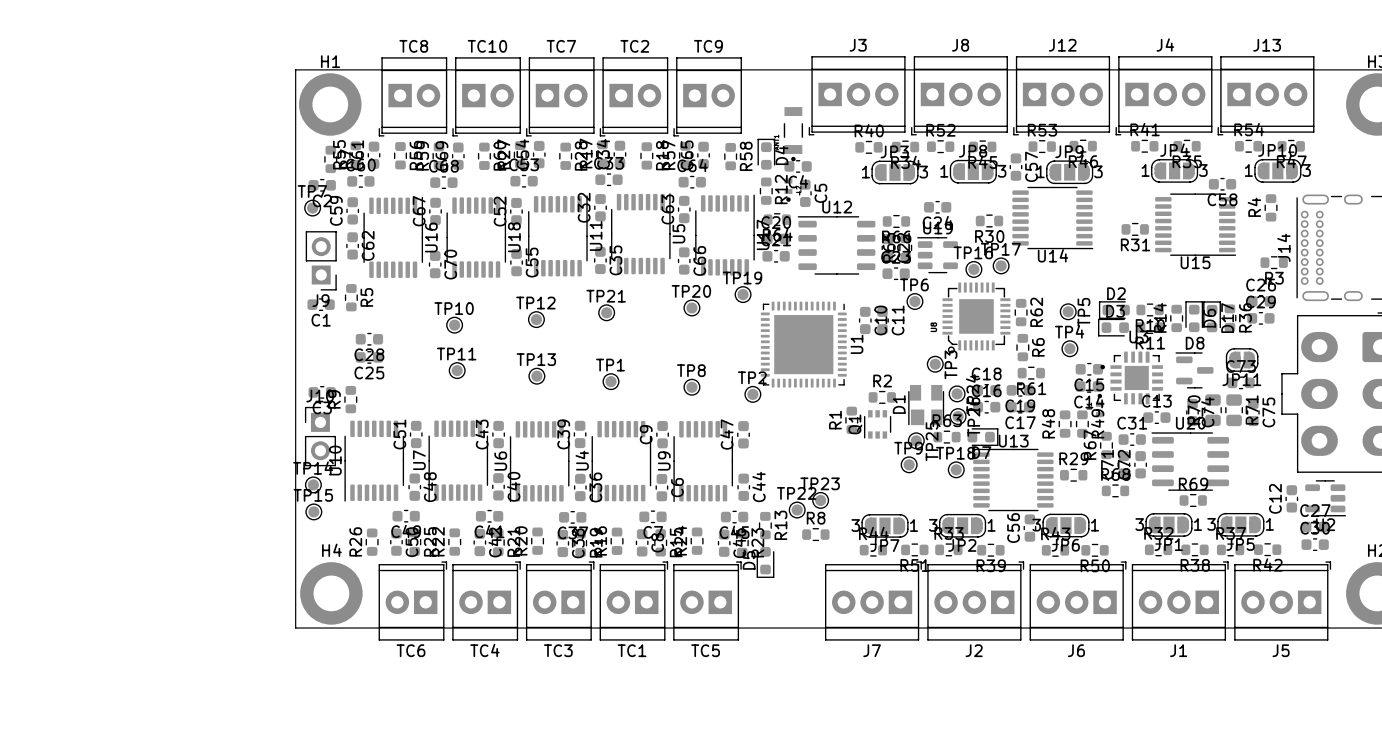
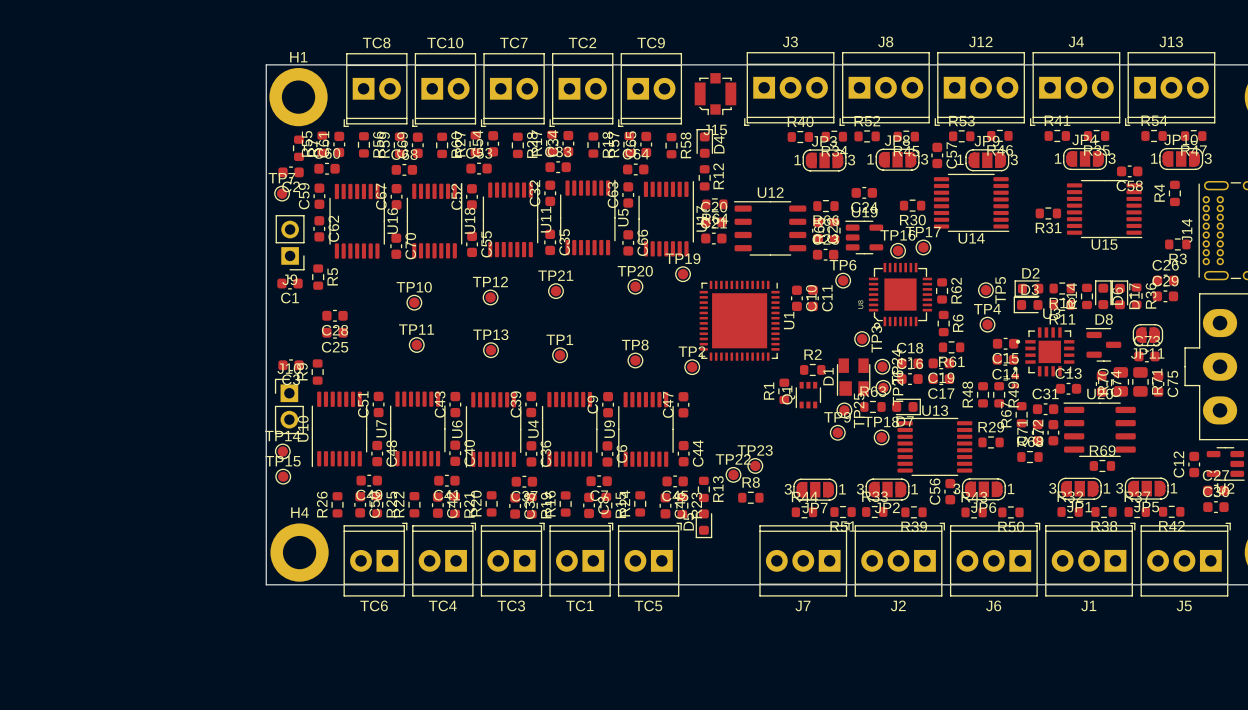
J15: none -> (715, 94)
part: (793, 134) -> none
C4: (798, 166) -> none
part: (788, 190) -> none
C5: (805, 193) -> none

